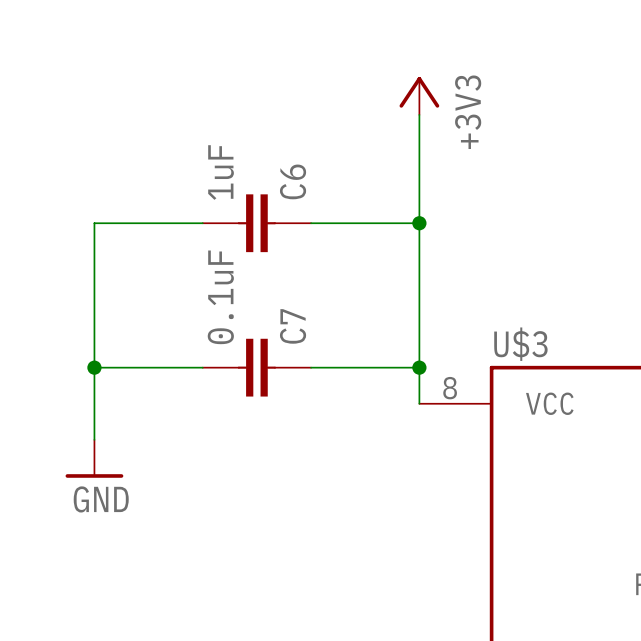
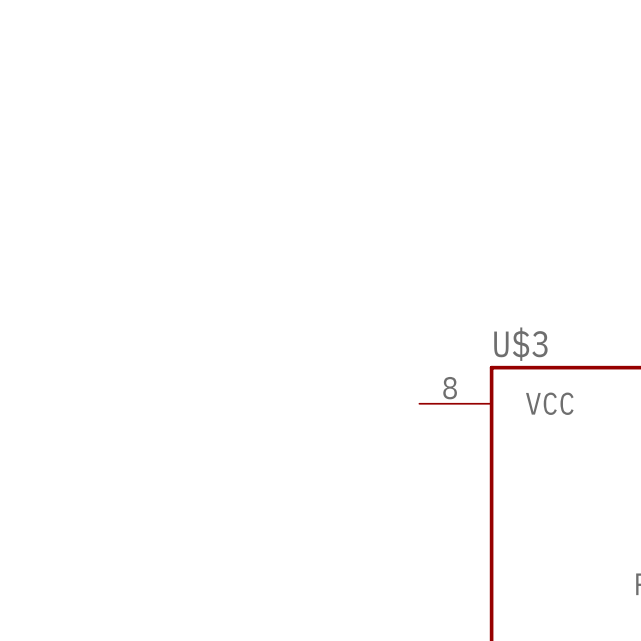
power symbol: +3V3 (419, 95) -> none
wire: (419, 114) (419, 403) -> none
wire: (202, 223) (94, 223) (94, 439) -> none
C6: 1uF (256, 223) -> none
wire: (311, 223) (419, 223) -> none
junction: (419, 223) -> none
wire: (94, 367) (202, 367) -> none
junction: (94, 367) -> none
C7: 0.1uF (256, 367) -> none
wire: (311, 367) (419, 367) -> none
junction: (419, 367) -> none
power symbol: GND (94, 458) -> none

